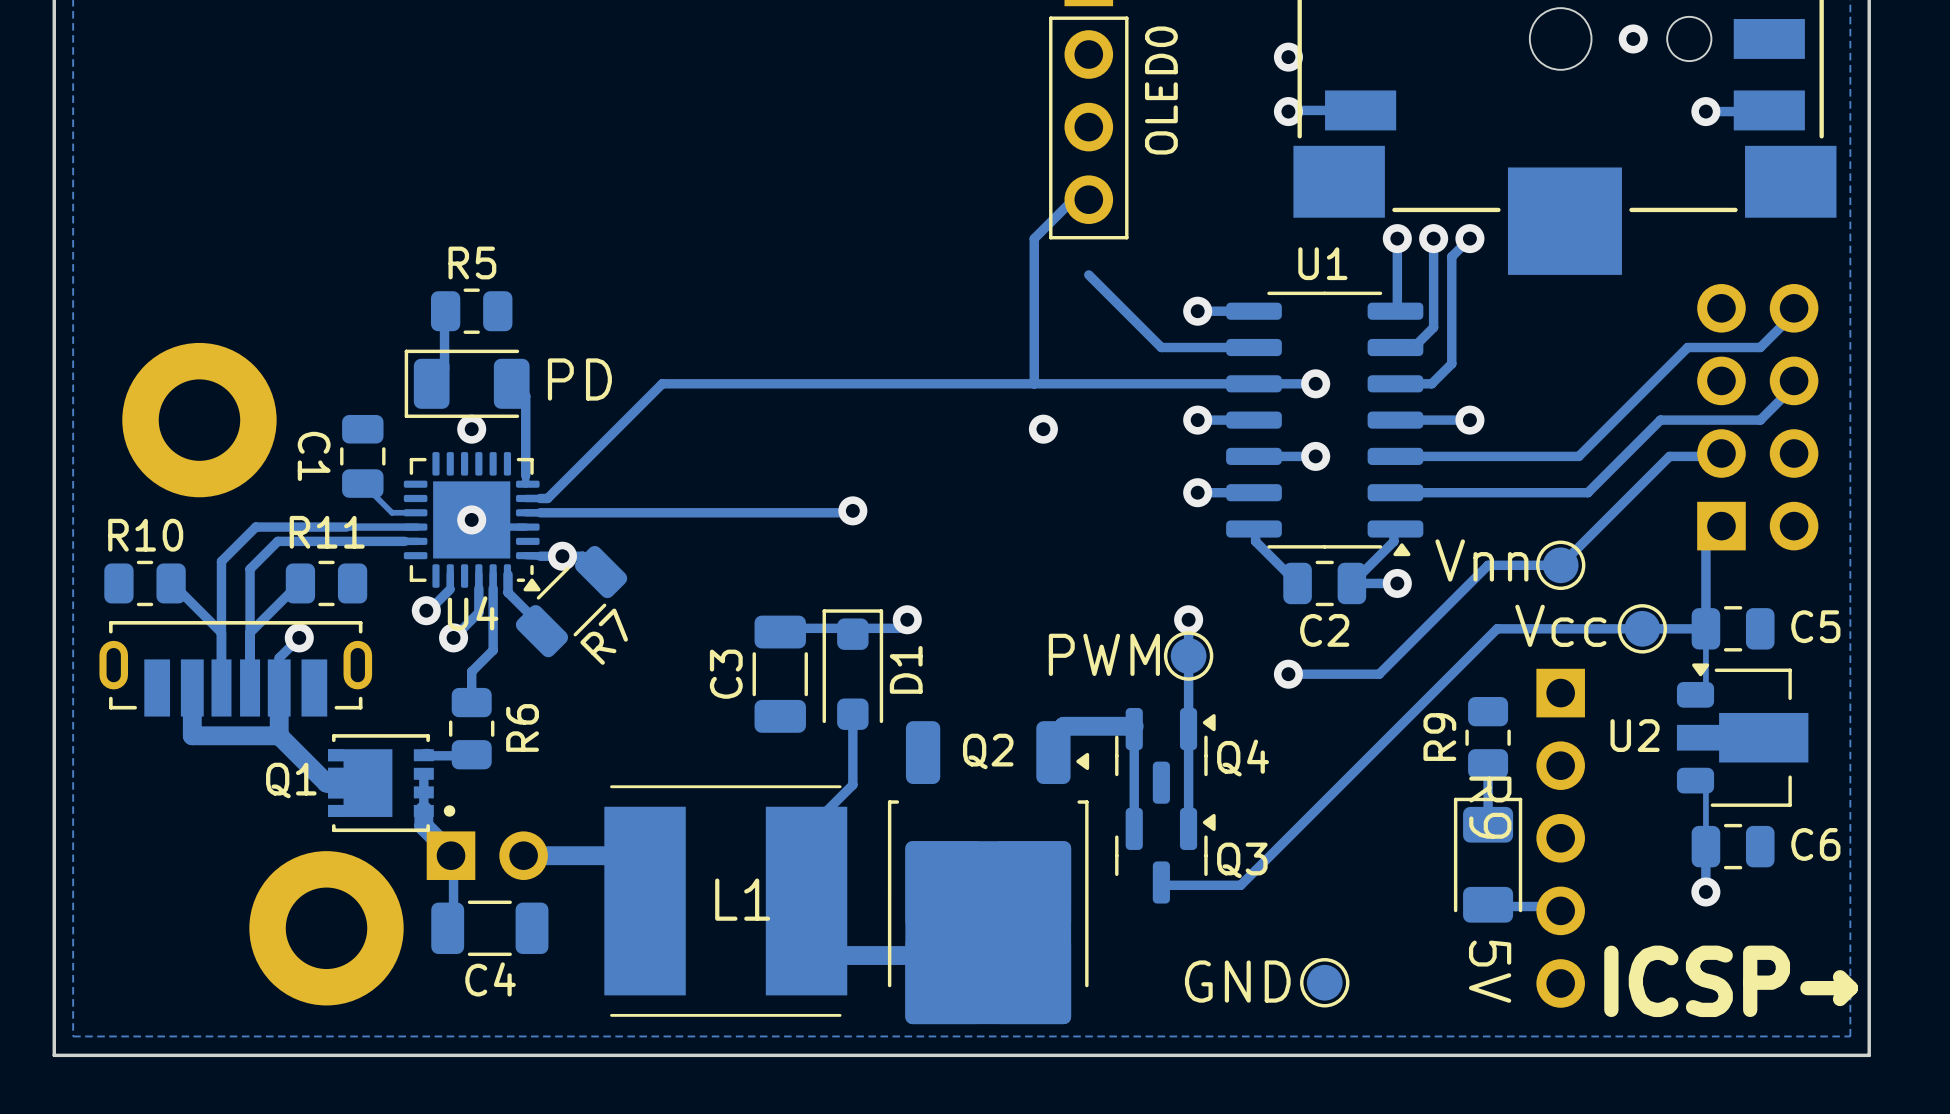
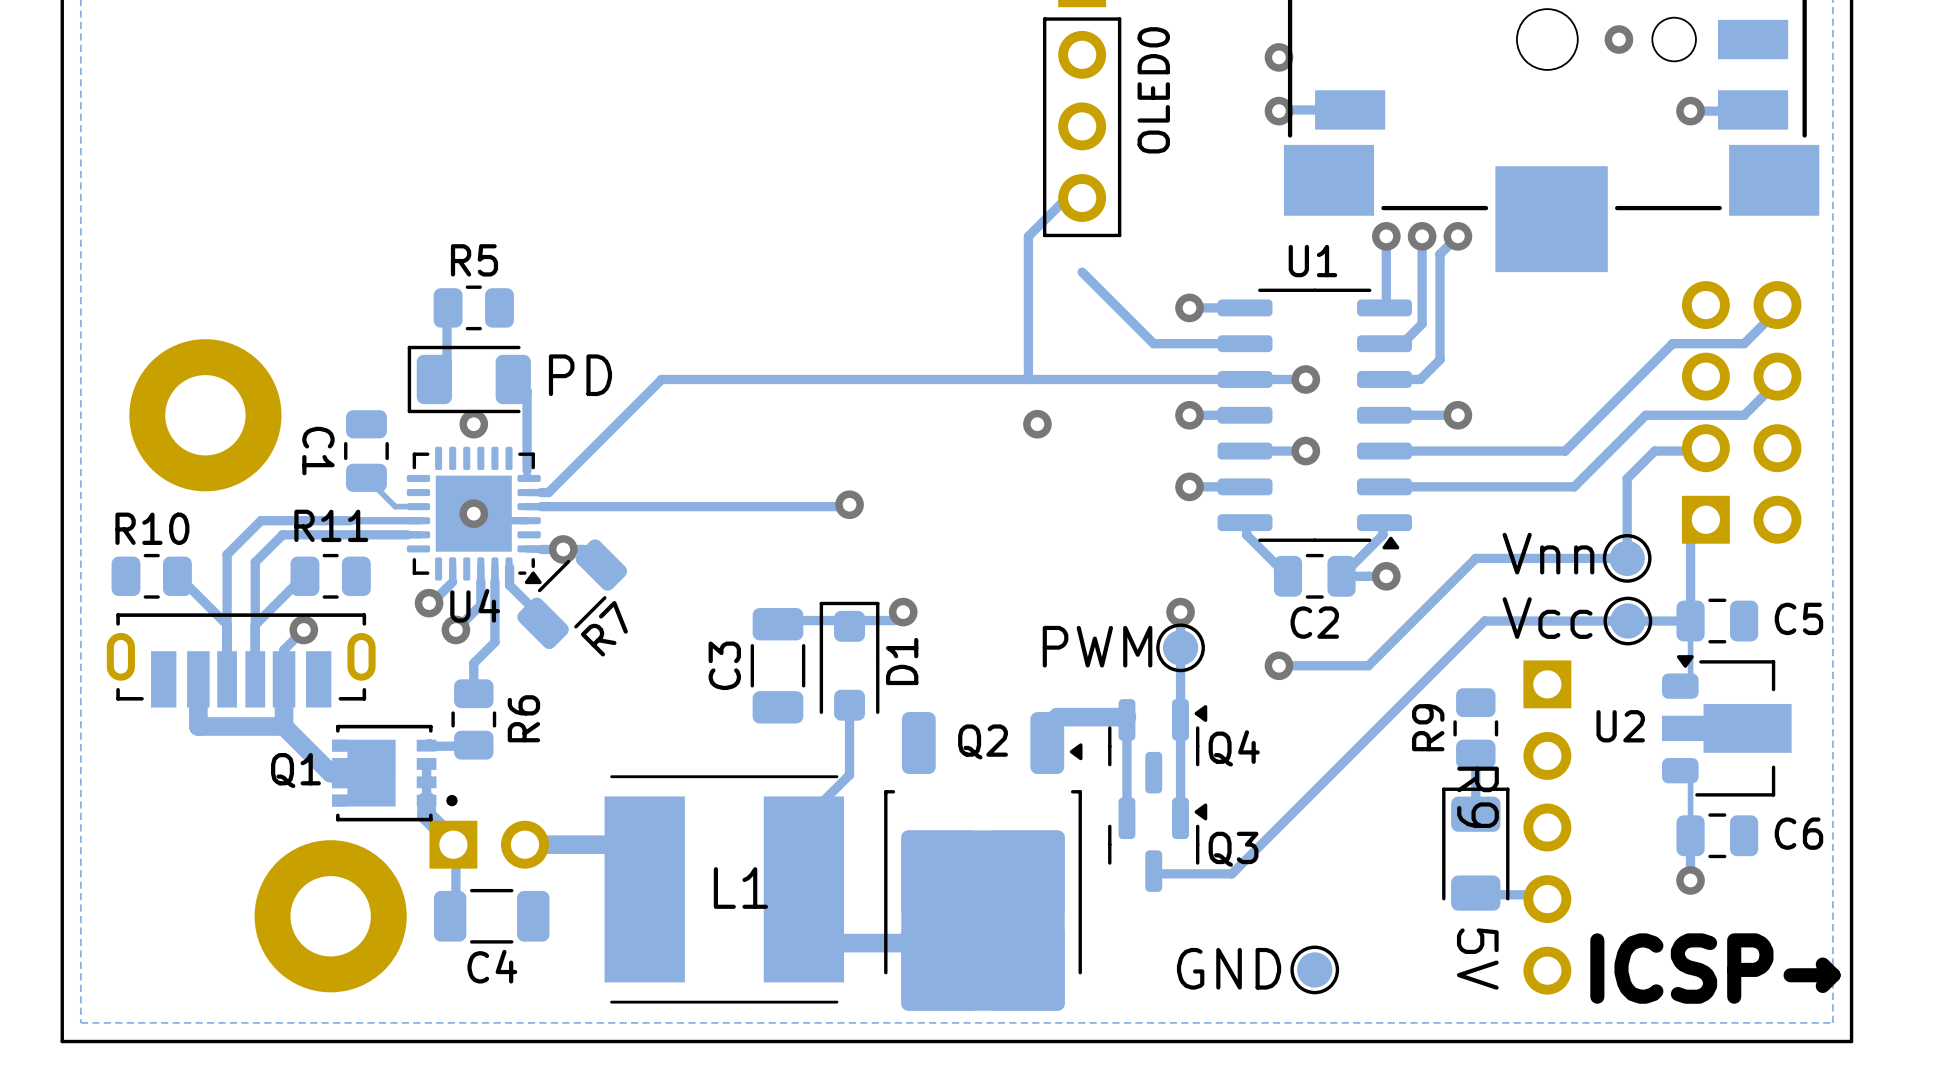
track: (1641, 484) (1560, 565) -> (1627, 478) (1627, 558) (1547, 558)
text position: Vnn (1481, 560) -> Vnn (1548, 553)
part position: (1560, 565) -> (1627, 558)

